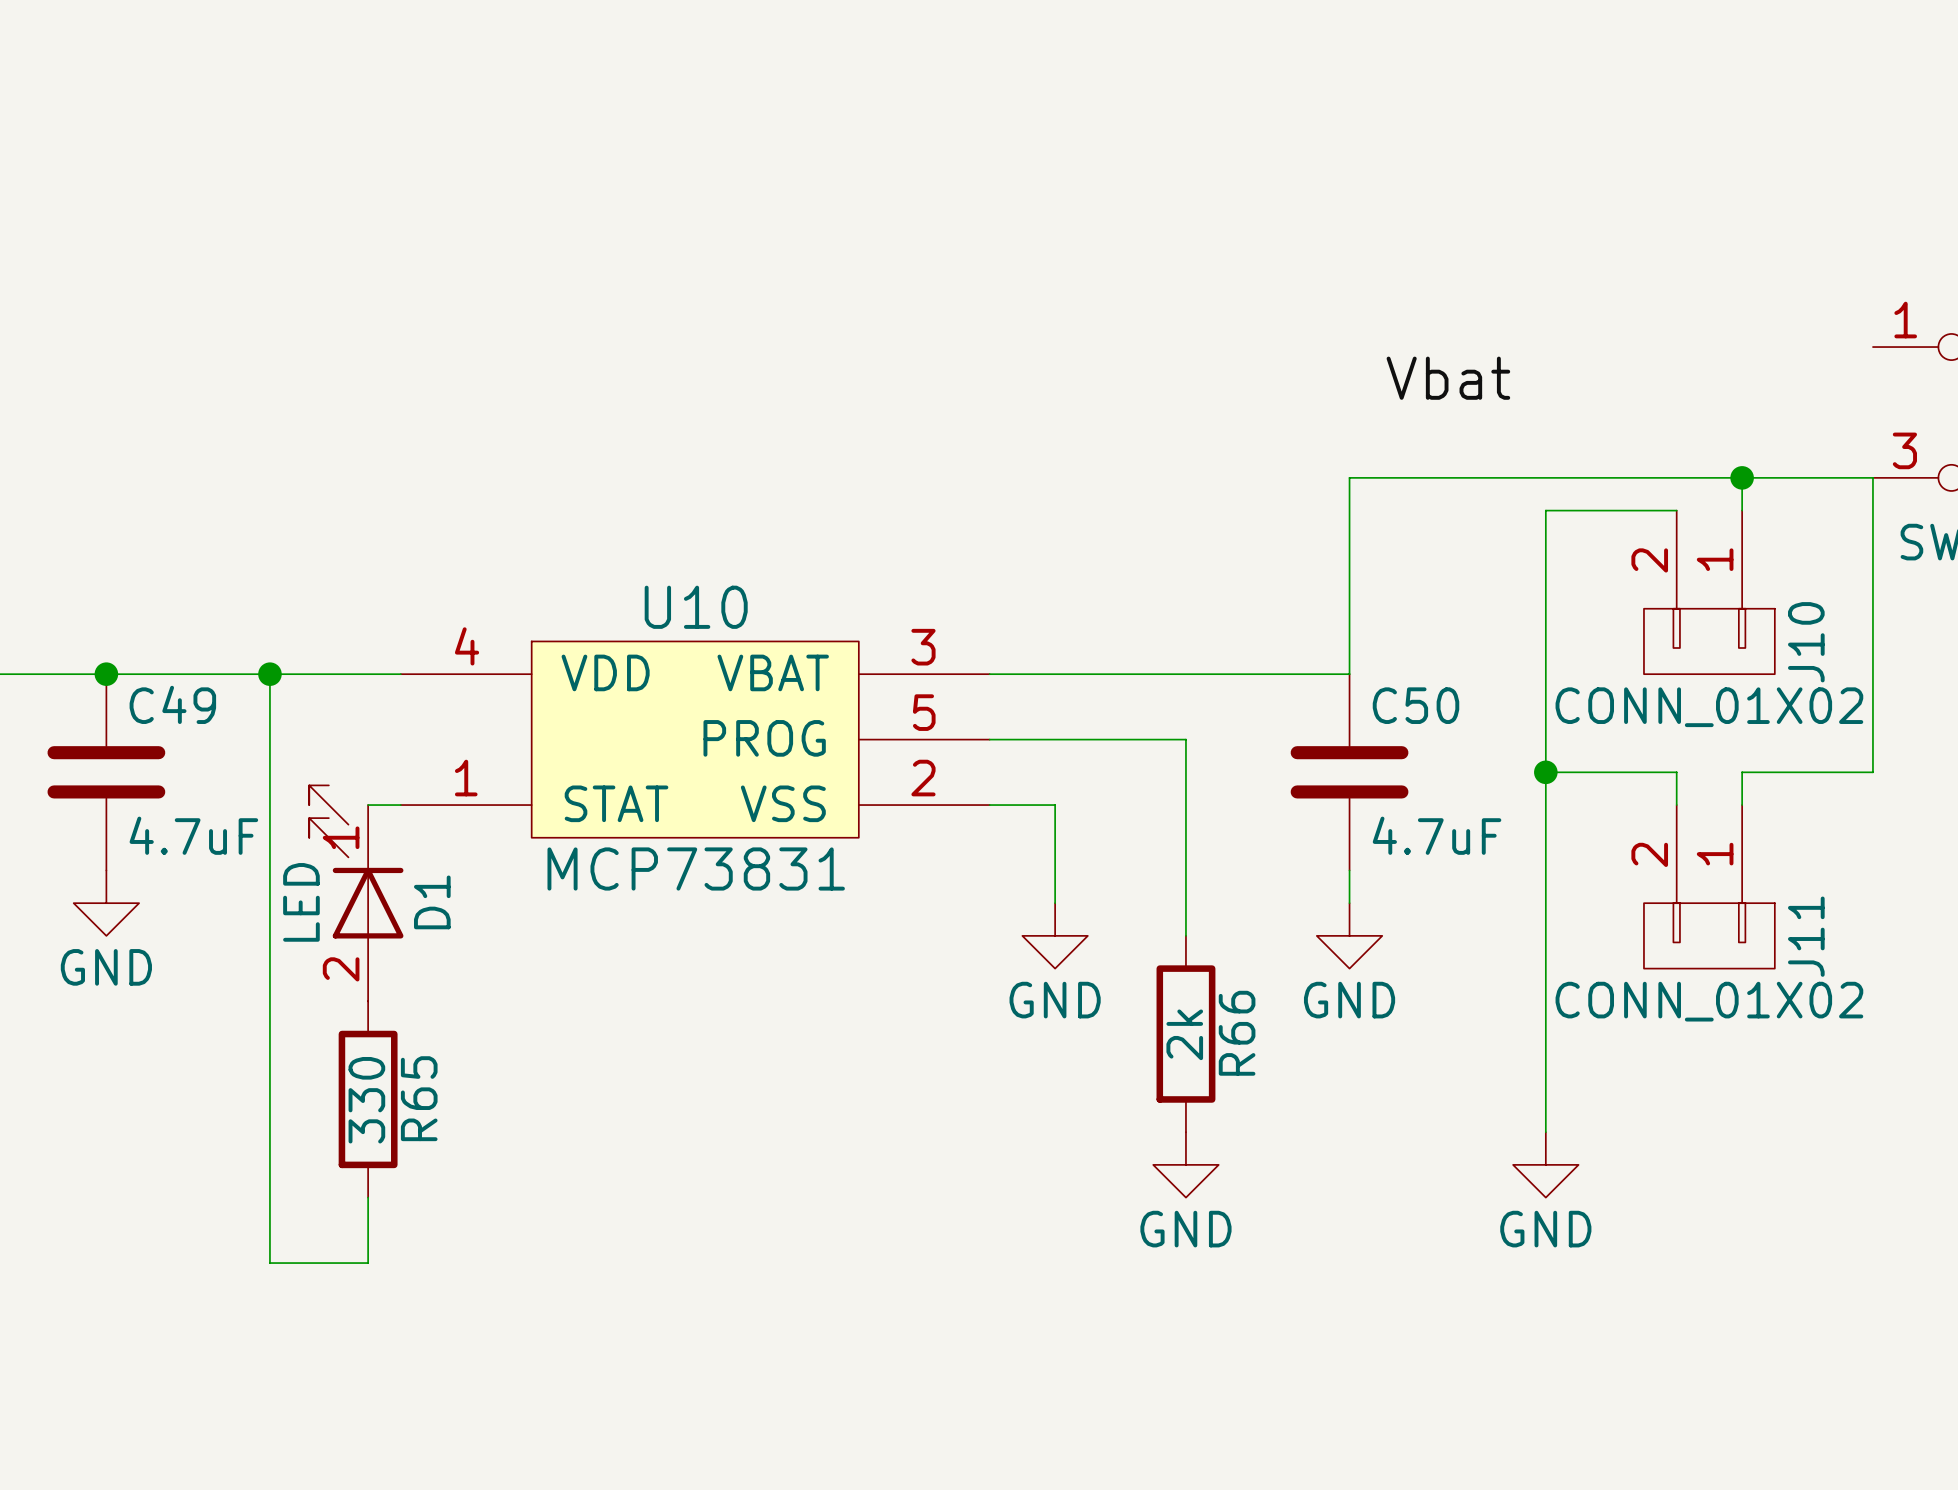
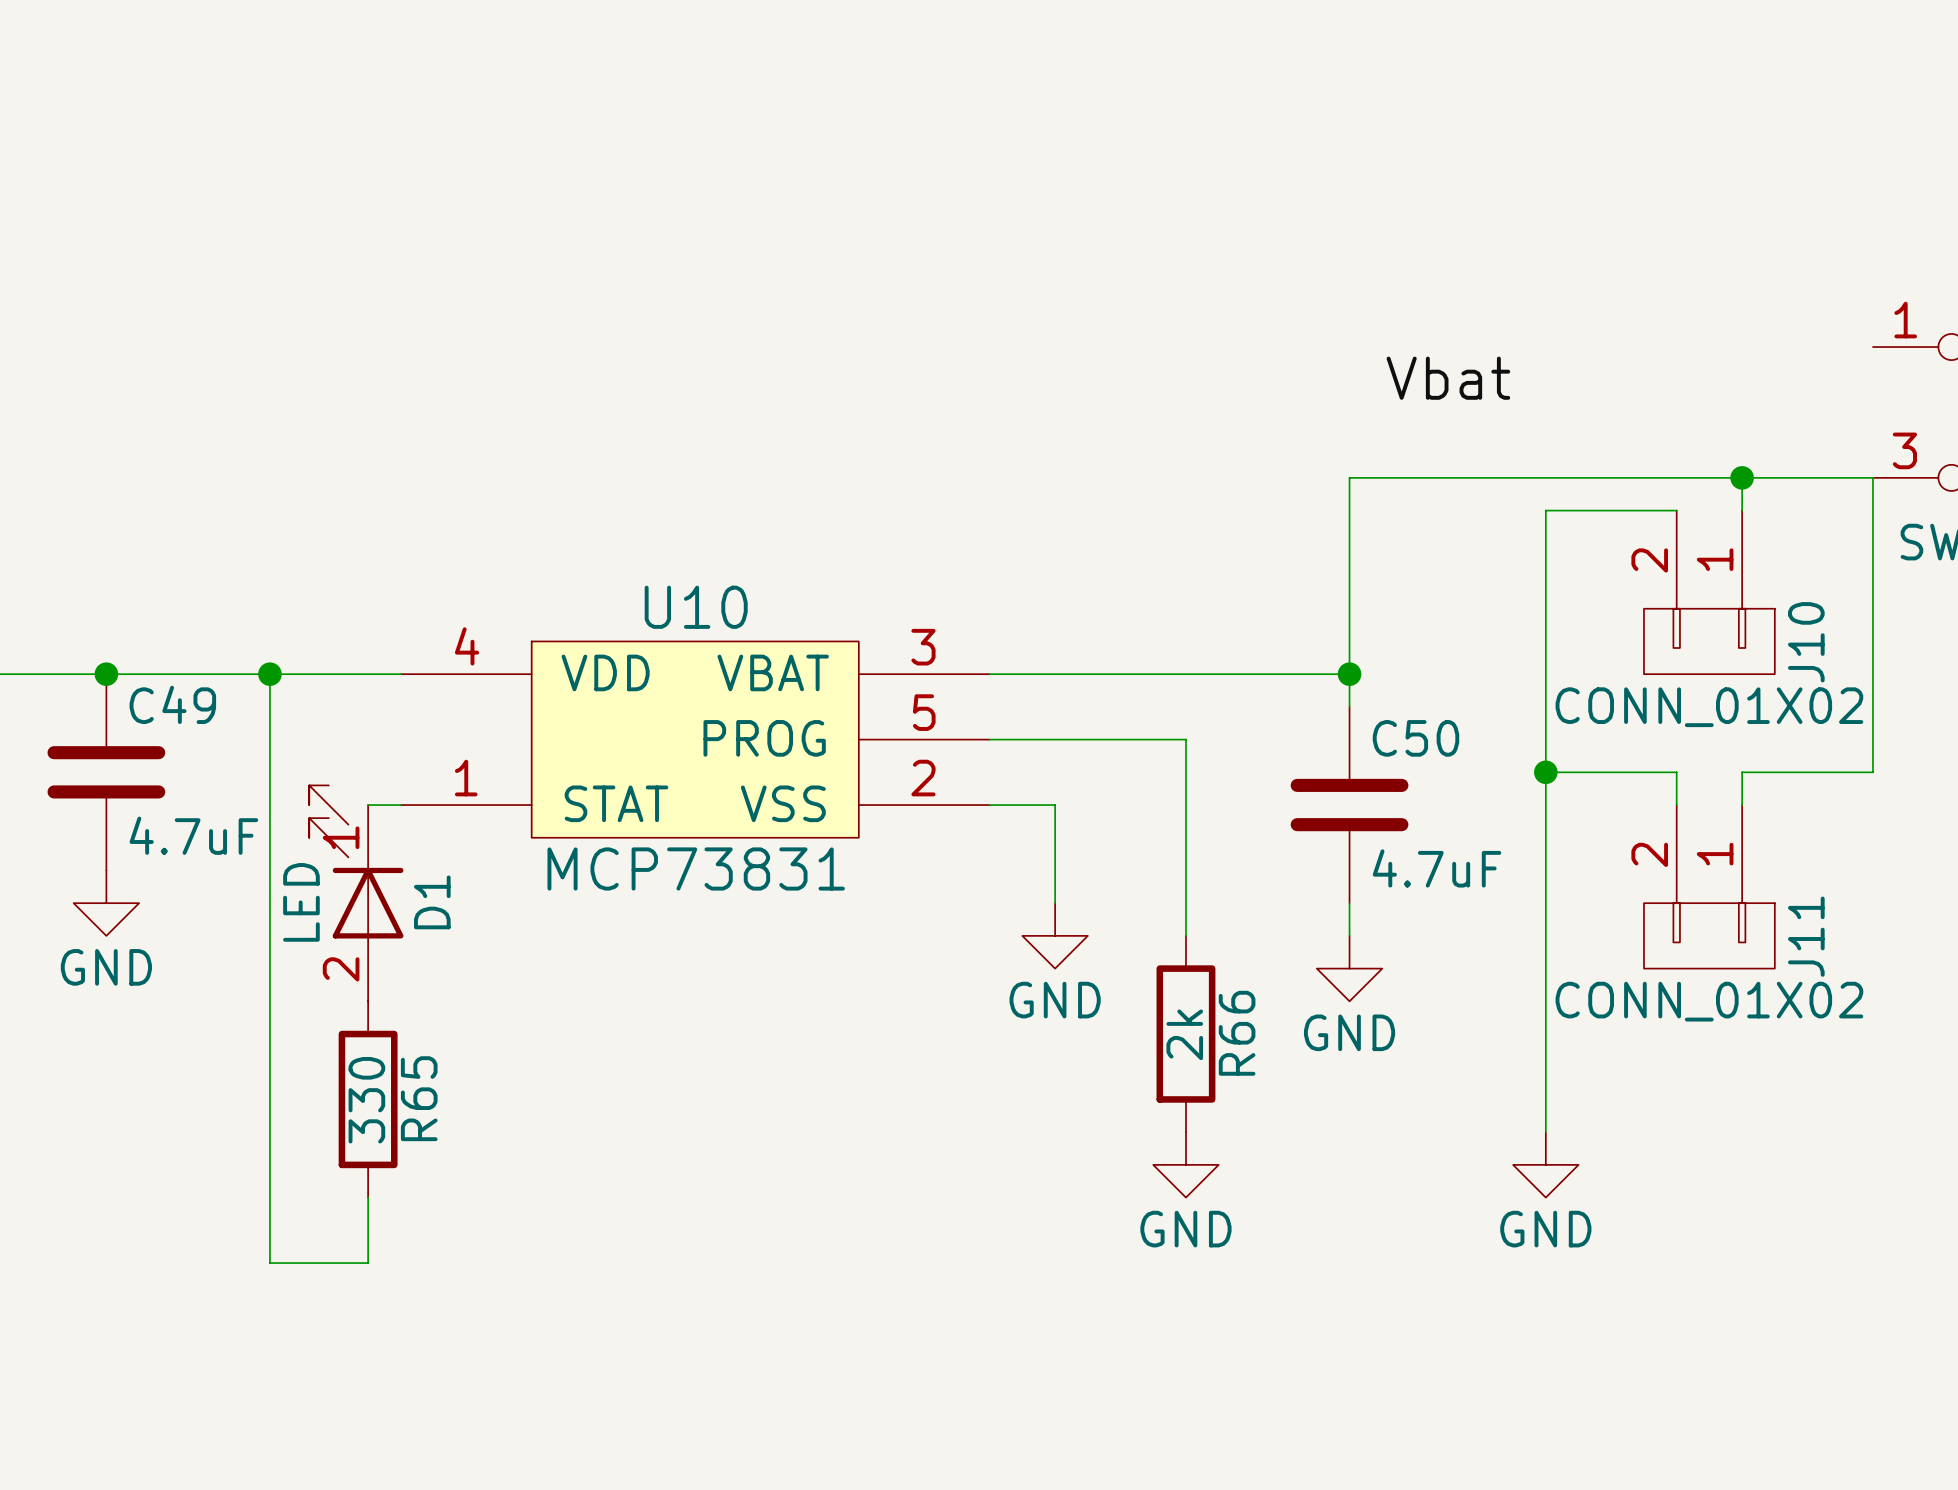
junction: none -> (1349, 674)
C50 position: (1349, 772) -> (1349, 805)
power symbol position: GND (1349, 935) -> GND (1349, 968)

